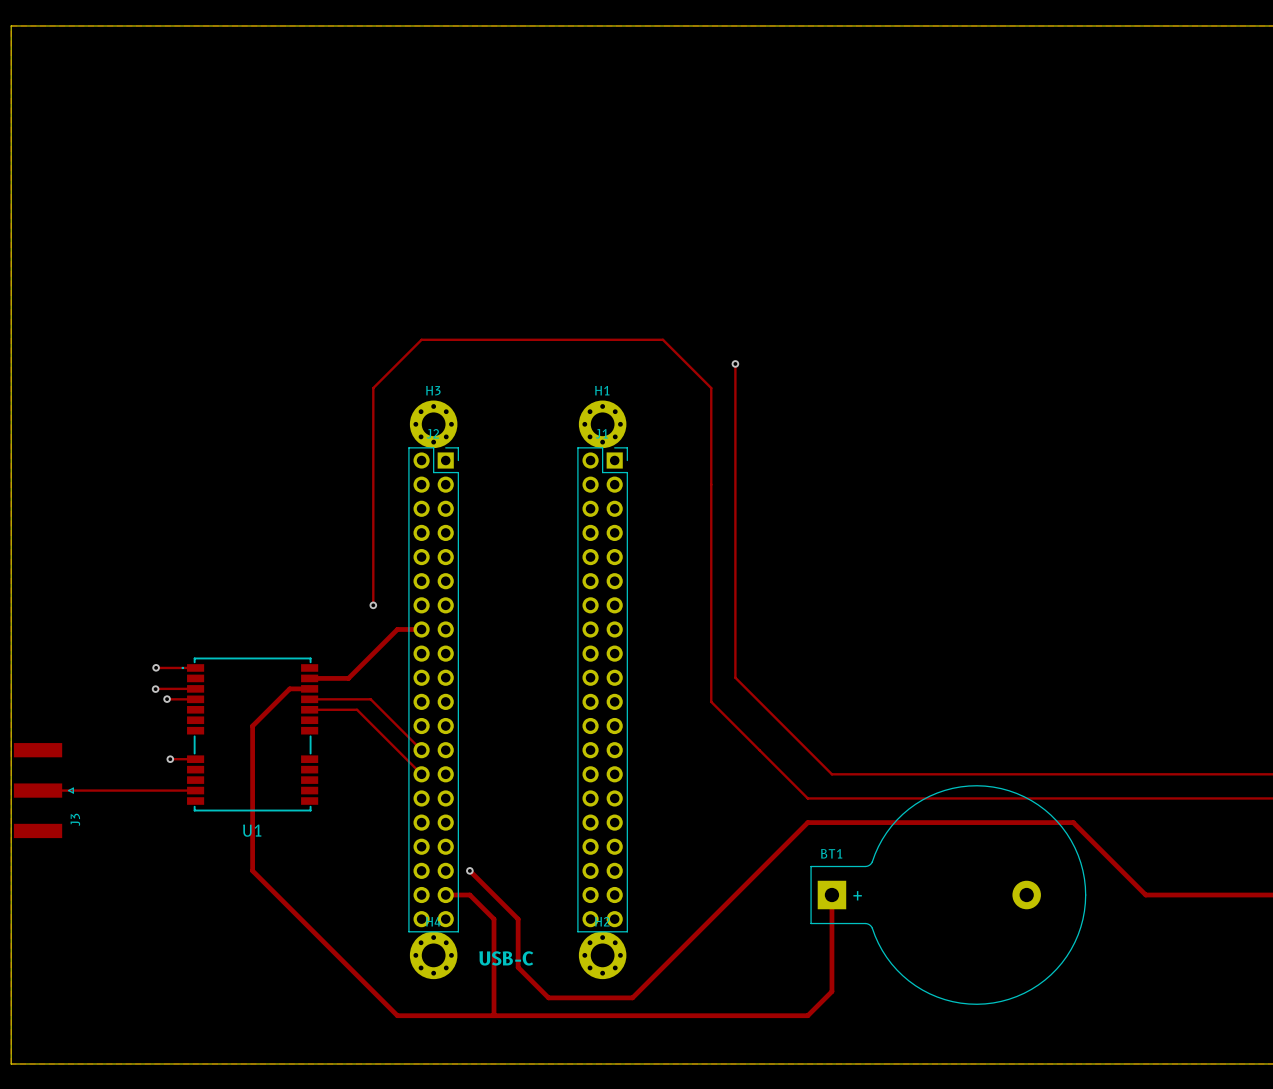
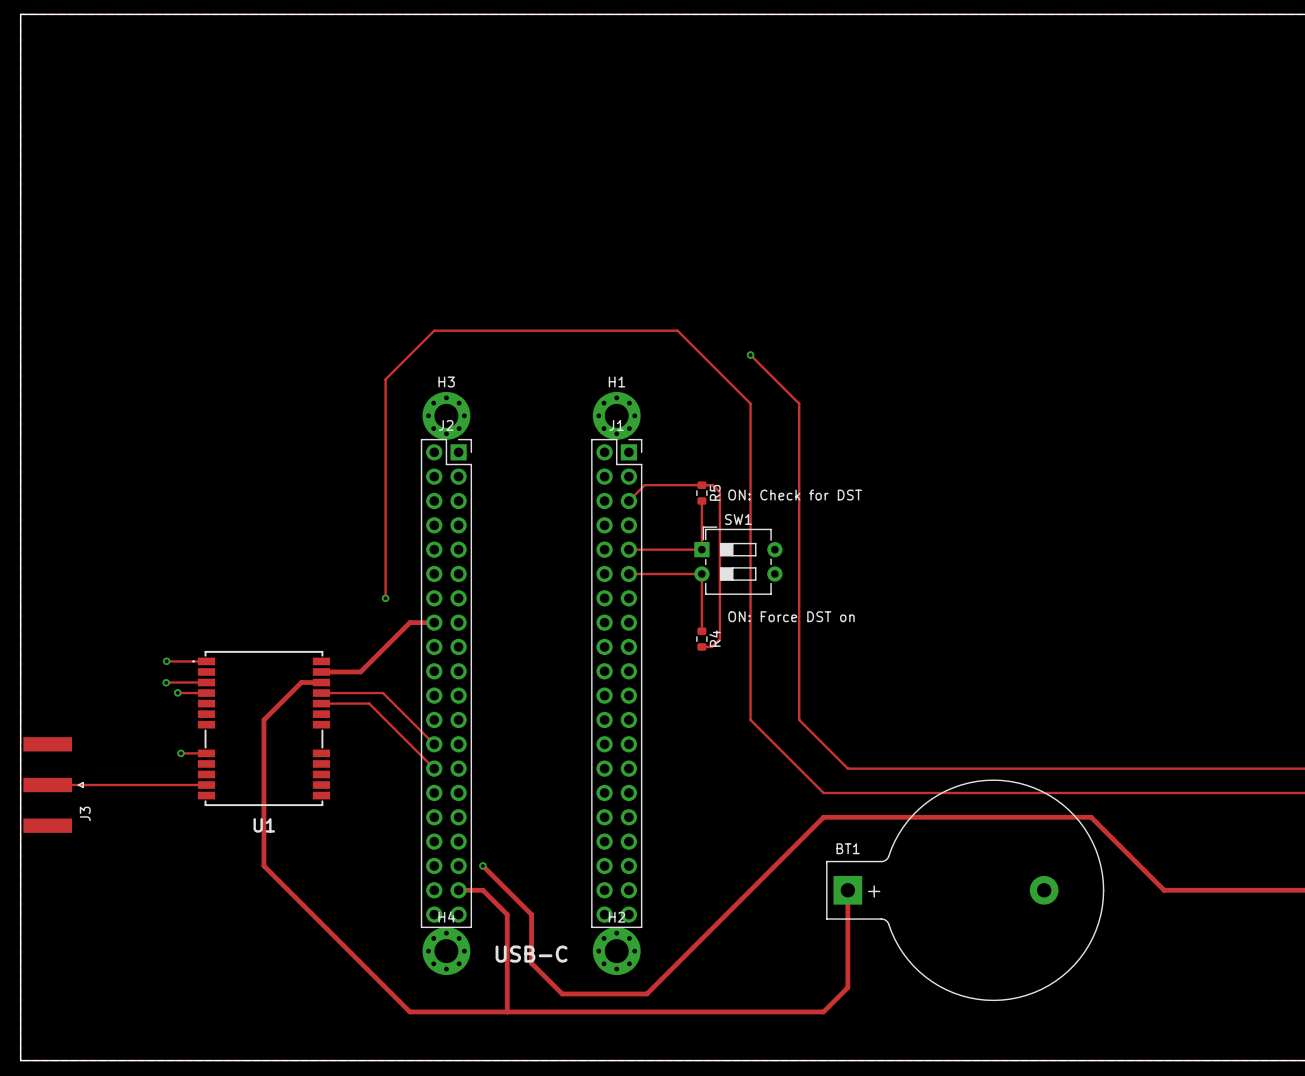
track: (735, 363) (735, 412) -> (726, 379) (750, 403)
track: none -> (750, 355) (799, 403) (799, 719)
track: (711, 388) (711, 701) (735, 726) -> none
R5: none -> (701, 493)
text: none -> ON: Check for DST (795, 495)
track: none -> (628, 501) (644, 485) (712, 485) (719, 492) (719, 639) (711, 646) (701, 646)
track: none -> (701, 501) (701, 549) (628, 549)
SW1: none -> (738, 560)
track: none -> (628, 573) (701, 573) (701, 631)
text: none -> ON: Force DST on (791, 616)
R4: none -> (701, 639)
track: (735, 677) (783, 726) -> (750, 671) (750, 719)

